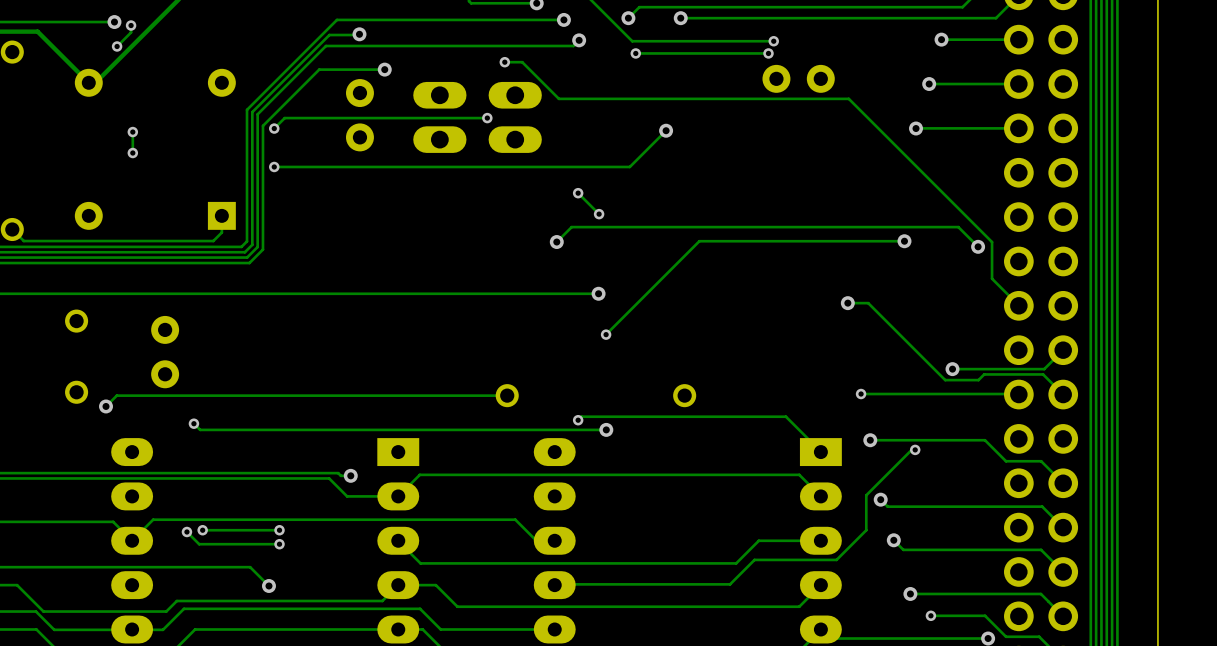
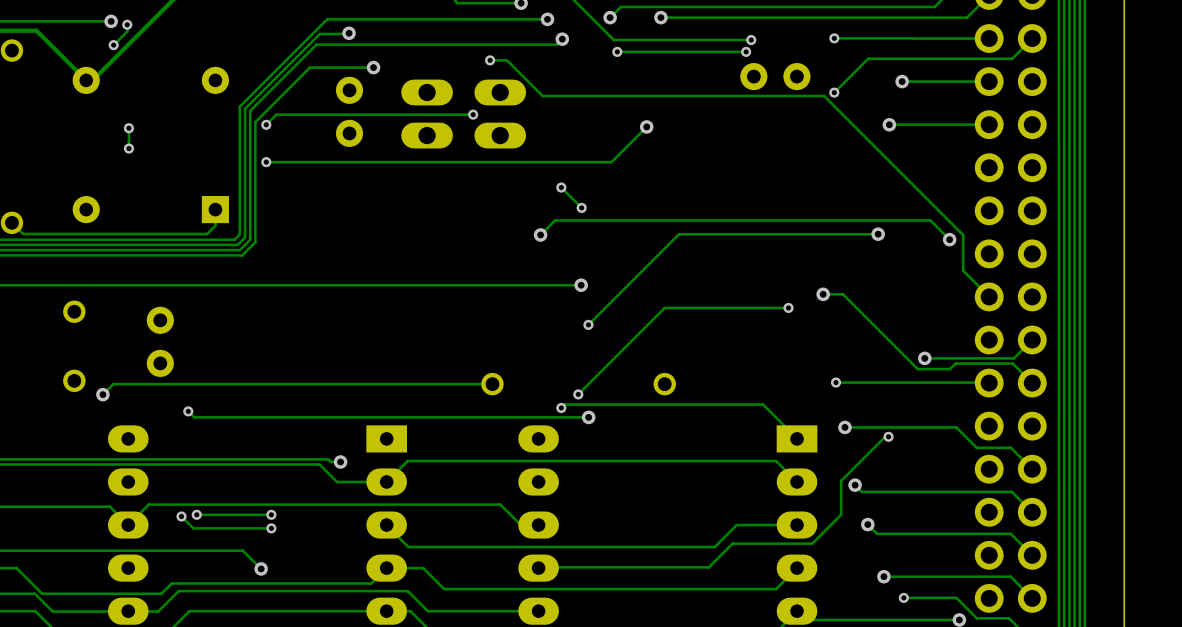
via: none -> (834, 38)
track: none -> (914, 38) (834, 38)
via: (941, 39) -> none
track: none -> (1032, 38) (1012, 58) (868, 58) (834, 92)
via: none -> (834, 92)
track: none -> (788, 307) (664, 307) (578, 394)
via: none -> (788, 307)
via: none -> (578, 394)

